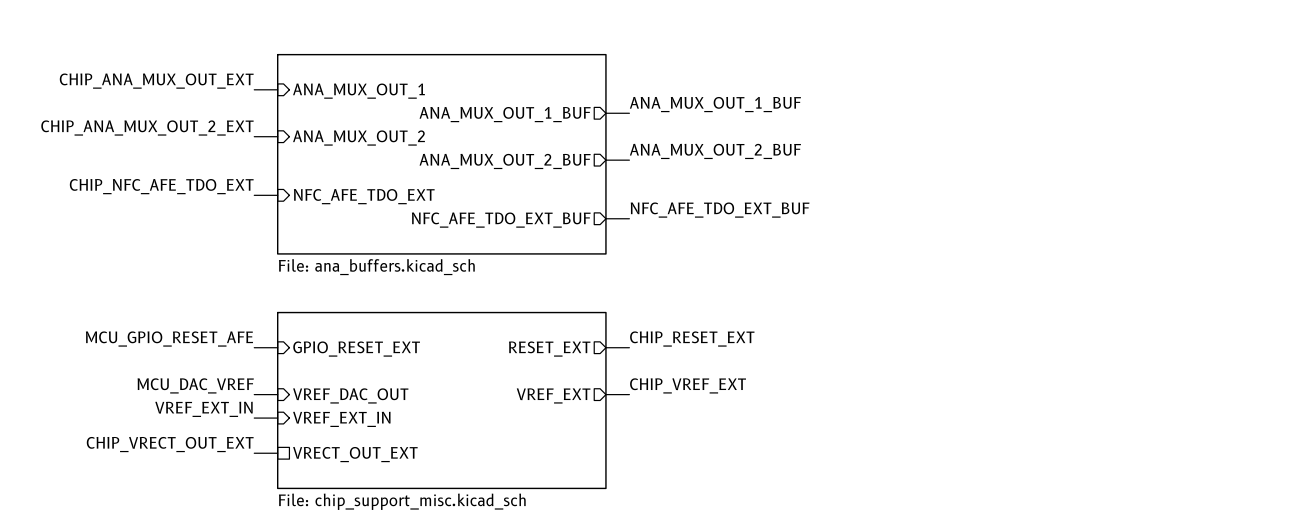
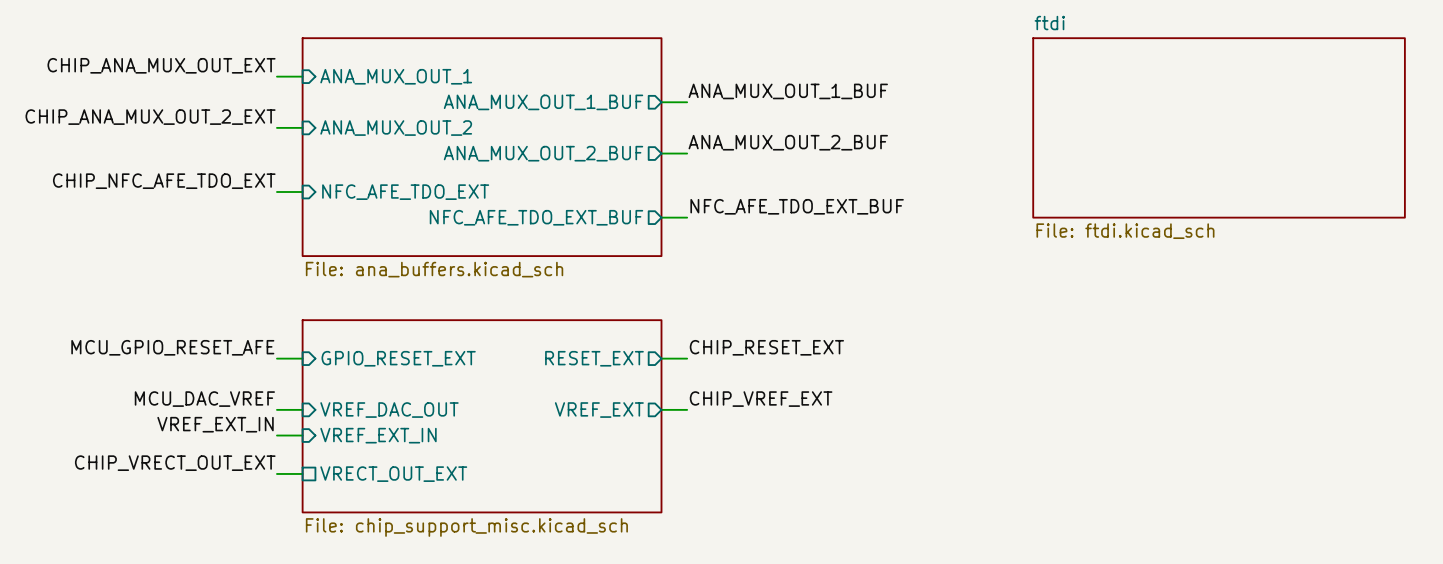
sheet ftdi: none -> File: ftdi.kicad_sch (1219, 127)

